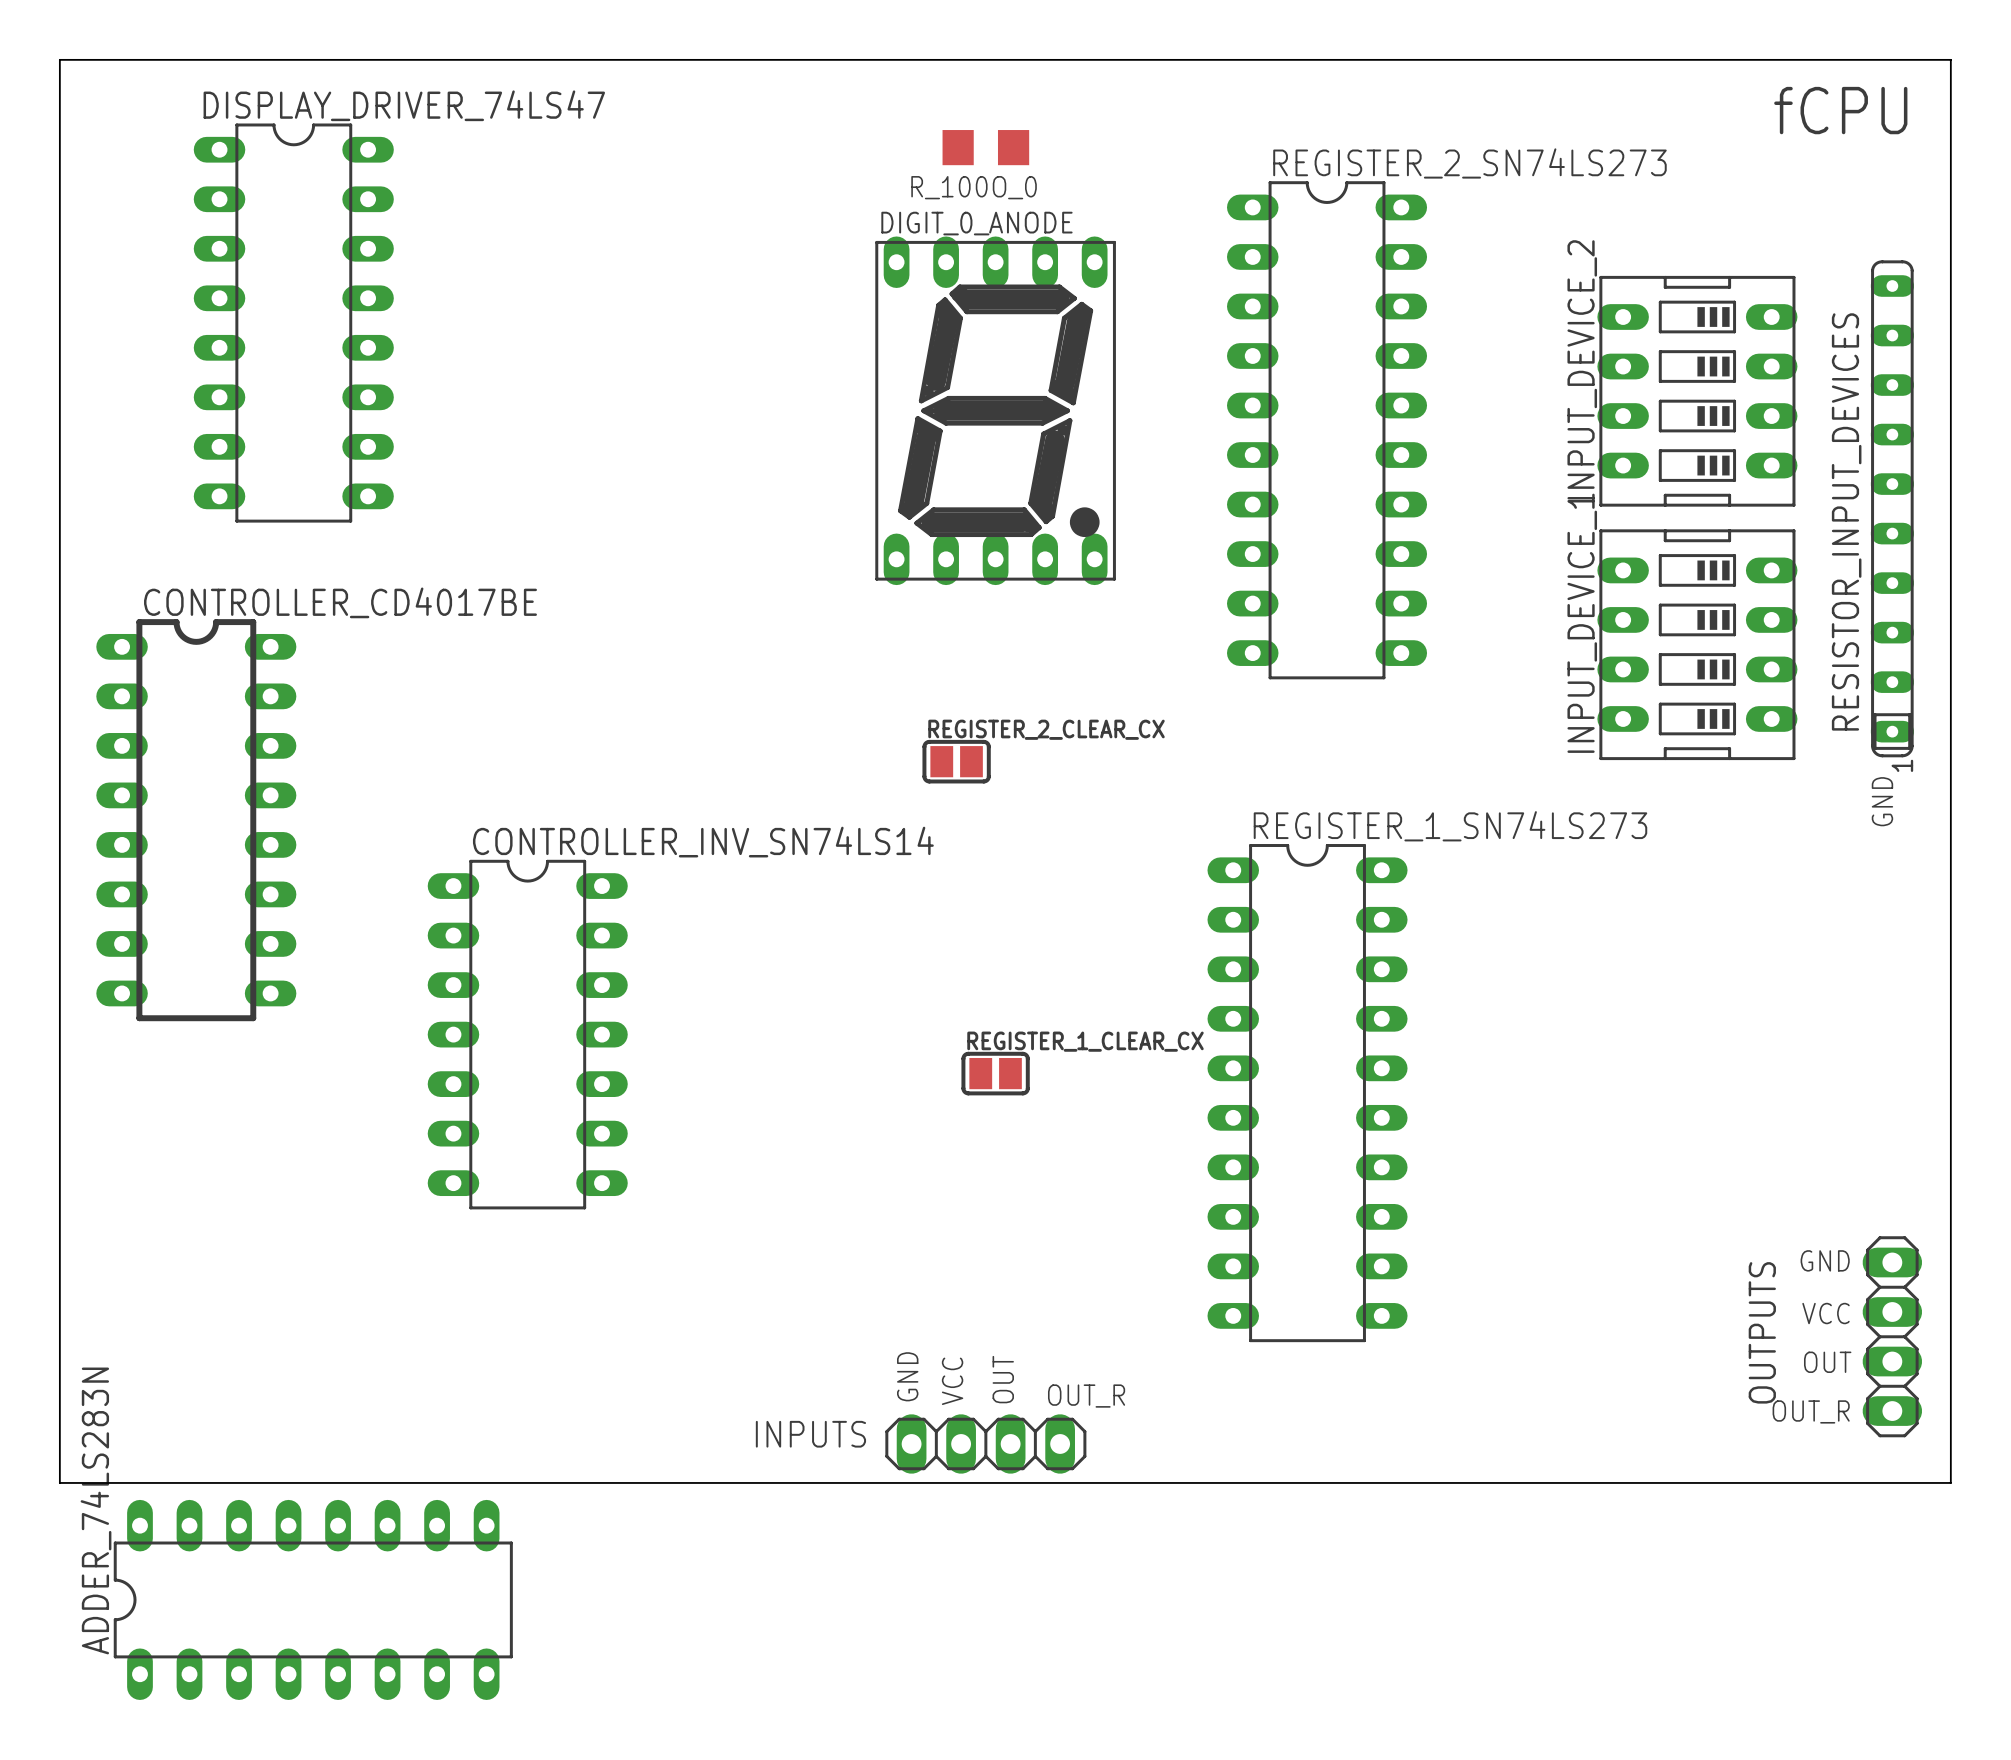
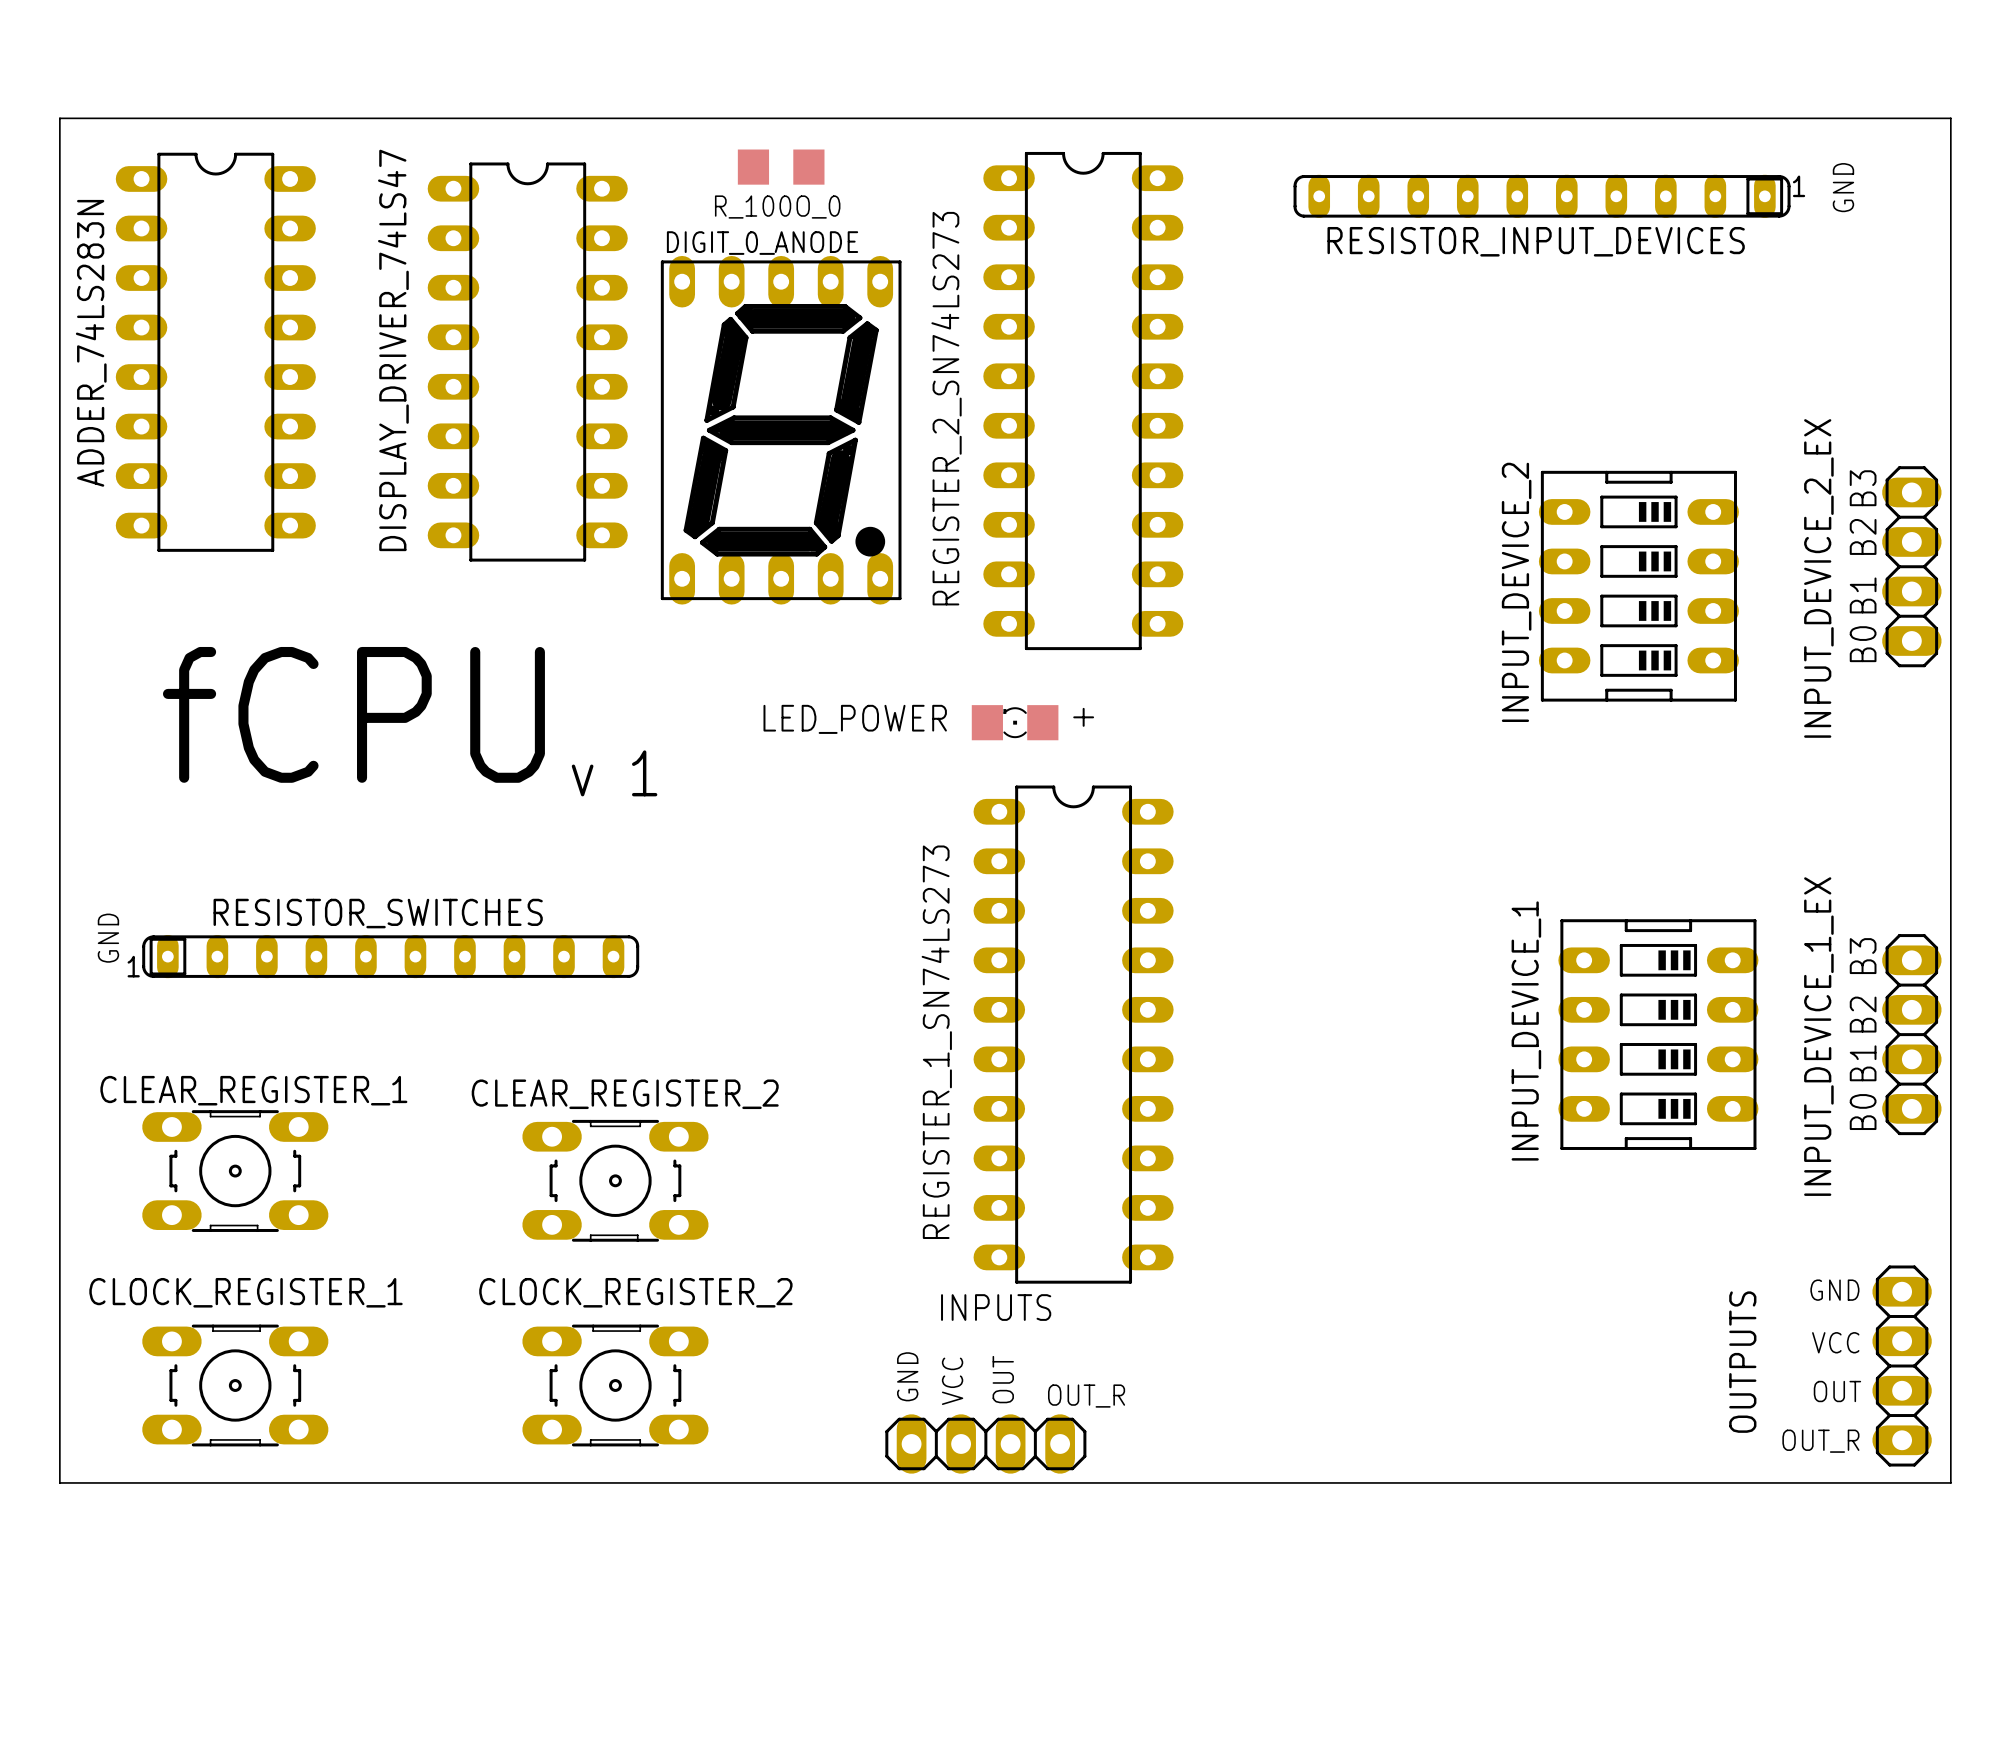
DISPLAY_DRIVER_74LS47 name rotation: 0° (404, 105) -> 90° counterclockwise (393, 350)
text: fCPU (1840, 110) -> none
board edge: (59, 118) (59, 59) (1950, 59) (1950, 118) -> (59, 118) (1950, 118)
R_100O_0 position: (985, 147) -> (781, 167)
REGISTER_2_SN74LS273 name rotation: 0° (1469, 163) -> 90° counterclockwise (946, 408)
R_100O_0 name position: R_100O_0 (974, 187) -> R_100O_0 (777, 207)
text: none -> GND (1843, 187)
RESISTOR_INPUT_DEVICES: none -> (1542, 196)
DISPLAY_DRIVER_74LS47 position: (293, 323) -> (527, 362)
INPUT_DEVICE_2 name position: INPUT_DEVICE_2 (1582, 369) -> INPUT_DEVICE_2 (1516, 592)
INPUT_DEVICE_2 position: (1697, 391) -> (1638, 586)
DIGIT_0_ANODE position: (995, 410) -> (781, 430)
REGISTER_2_SN74LS273 position: (1327, 430) -> (1083, 401)
text: none -> B3 (1863, 488)
RESISTOR_INPUT_DEVICES: (1892, 508) -> none
text: none -> B2 (1863, 536)
INPUT_DEVICE_2_EX: none -> (1911, 566)
text: none -> B1 (1863, 595)
INPUT_DEVICE_1 name position: INPUT_DEVICE_1 (1582, 623) -> INPUT_DEVICE_1 (1526, 1030)
INPUT_DEVICE_1 position: (1697, 644) -> (1658, 1034)
text: none -> B0 (1863, 644)
text: none -> fCPU (353, 714)
text: none -> + (1083, 717)
LED_POWER: none -> (1015, 722)
REGISTER_2_CLEAR_CX: (956, 761) -> none
text: none -> v 1 (614, 773)
text: GND (1882, 801) -> none
CONTROLLER_CD4017BE: (196, 820) -> none
REGISTER_1_SN74LS273 name rotation: 0° (1450, 826) -> 90° counterclockwise (936, 1042)
text: none -> GND (108, 938)
RESISTOR_SWITCHES: none -> (390, 956)
text: none -> B3 (1863, 956)
text: none -> B2 (1863, 1014)
CONTROLLER_INV_SN74LS14: (527, 1034) -> none
INPUT_DEVICE_1_EX: none -> (1911, 1034)
text: none -> B1 (1863, 1063)
REGISTER_1_CLEAR_CX: (995, 1073) -> none
REGISTER_1_SN74LS273 position: (1307, 1093) -> (1073, 1034)
text: none -> B0 (1863, 1112)
CLEAR_REGISTER_1: none -> (235, 1171)
CLEAR_REGISTER_2: none -> (615, 1180)
text position: GND (1825, 1260) -> GND (1834, 1290)
text position: VCC (1826, 1313) -> VCC (1835, 1342)
OUTPUTS name position: OUTPUTS (1762, 1332) -> OUTPUTS (1742, 1362)
OUTPUTS position: (1892, 1336) -> (1902, 1366)
text position: OUT (1827, 1362) -> OUT (1837, 1391)
CLOCK_REGISTER_1: none -> (235, 1385)
CLOCK_REGISTER_2: none -> (615, 1385)
text position: OUT_R (1811, 1411) -> OUT_R (1820, 1441)
text position: INPUTS (810, 1434) -> INPUTS (996, 1307)
ADDER_74LS283N name position: ADDER_74LS283N (96, 1510) -> ADDER_74LS283N (91, 343)
ADDER_74LS283N rotation: 0° (313, 1599) -> 90° clockwise (215, 352)
ADDER_74LS283N position: (313, 1599) -> (215, 352)

